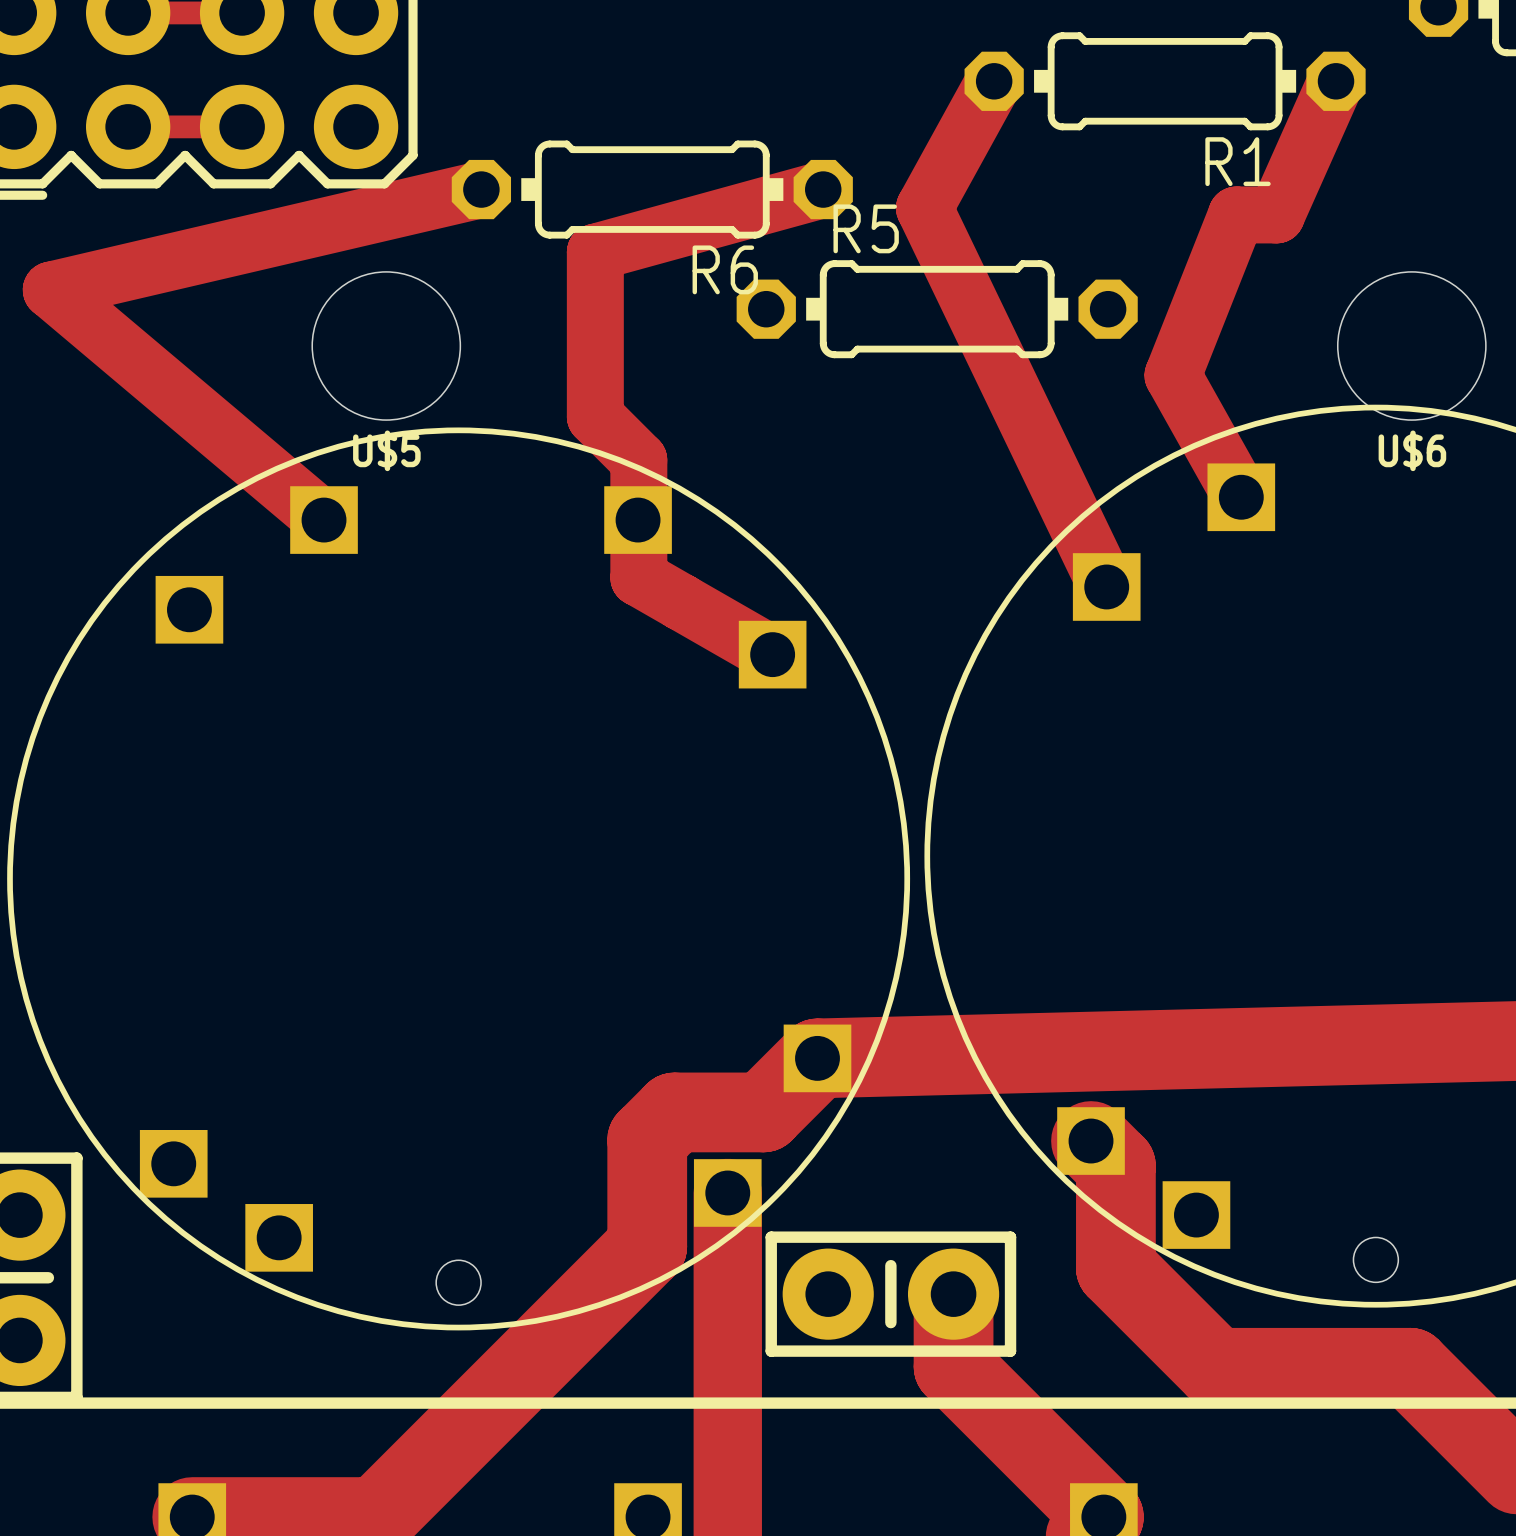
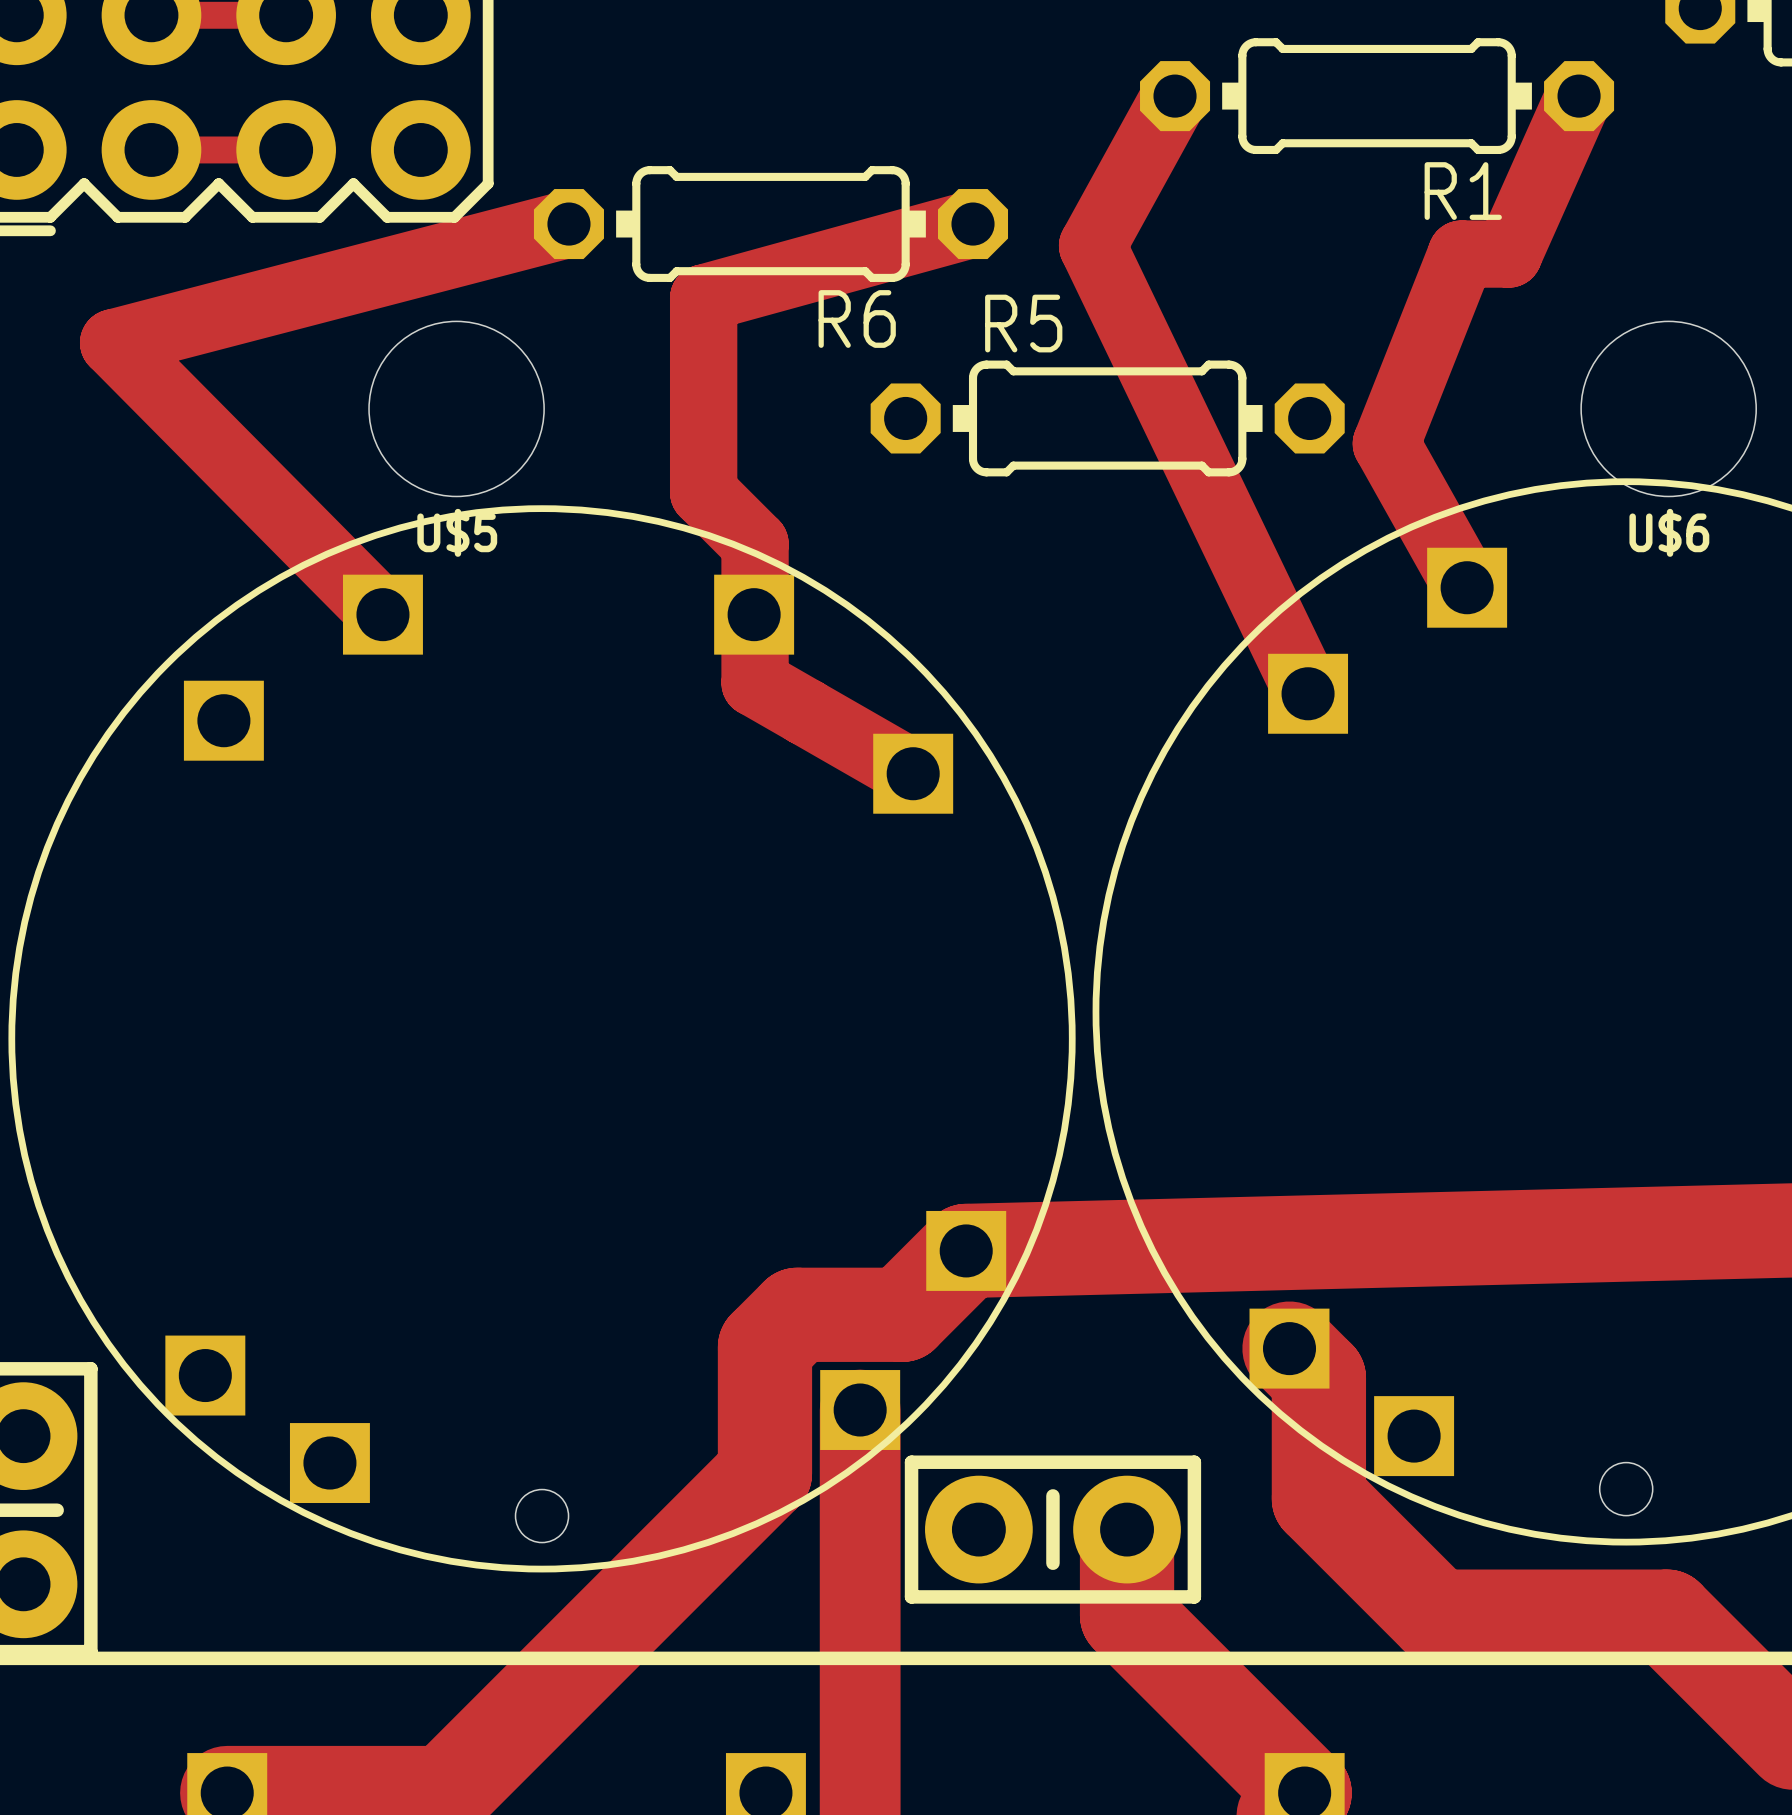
track: (481, 189) (51, 290) (324, 520) -> (568, 224) (113, 342) (382, 614)
R5 position: (937, 309) -> (1107, 418)

